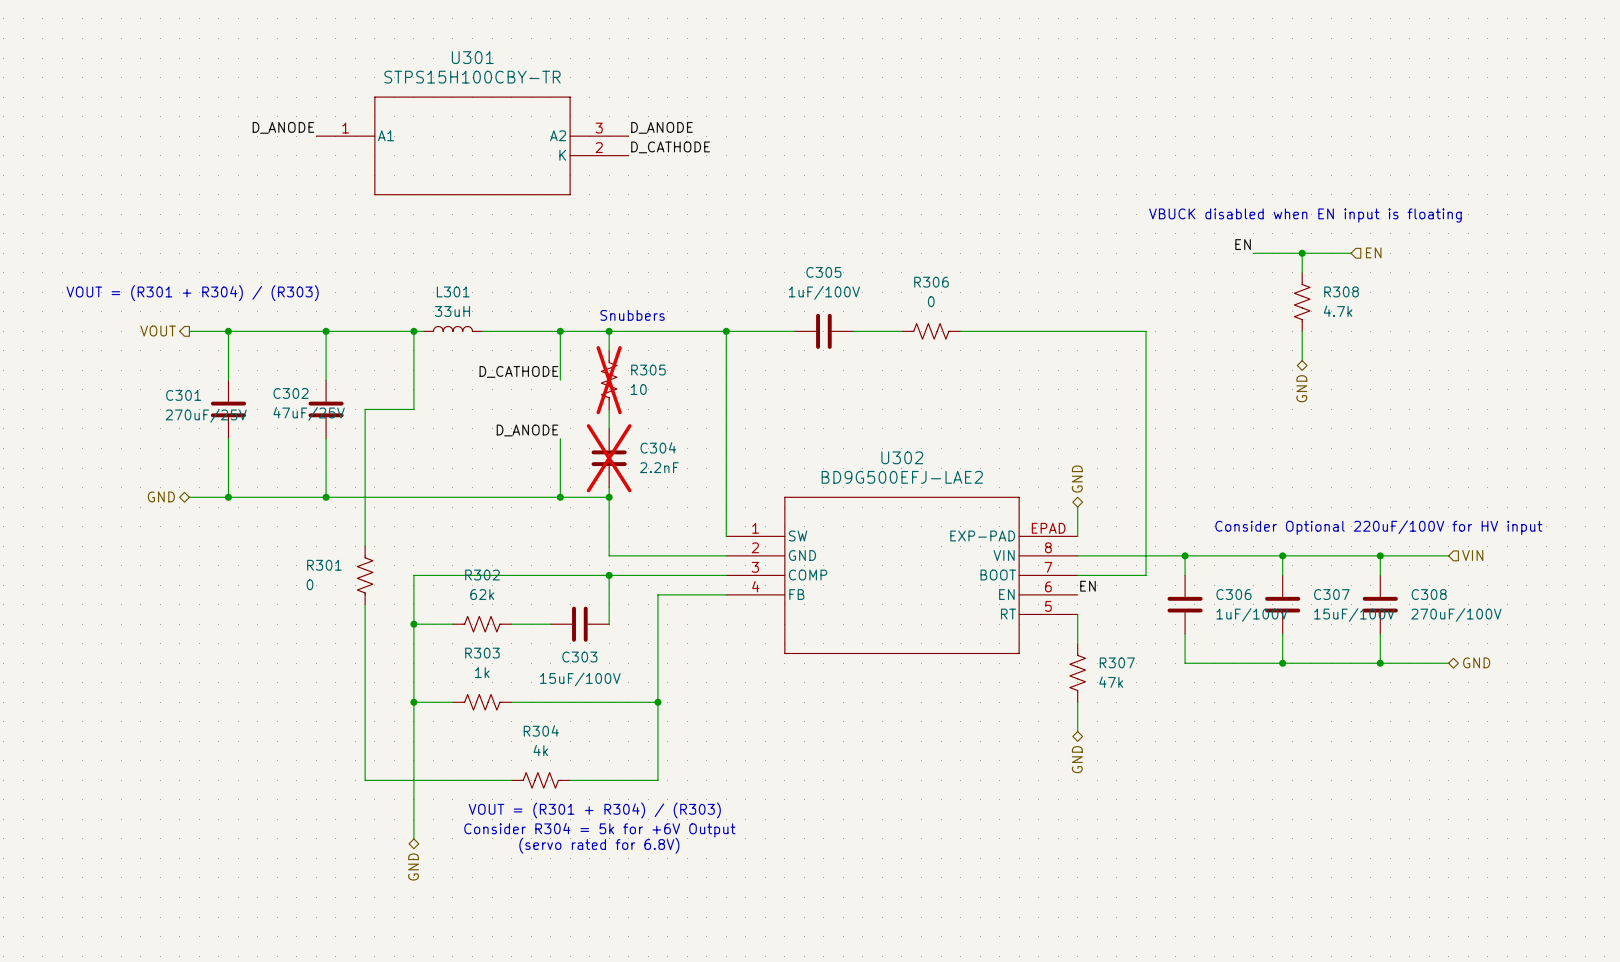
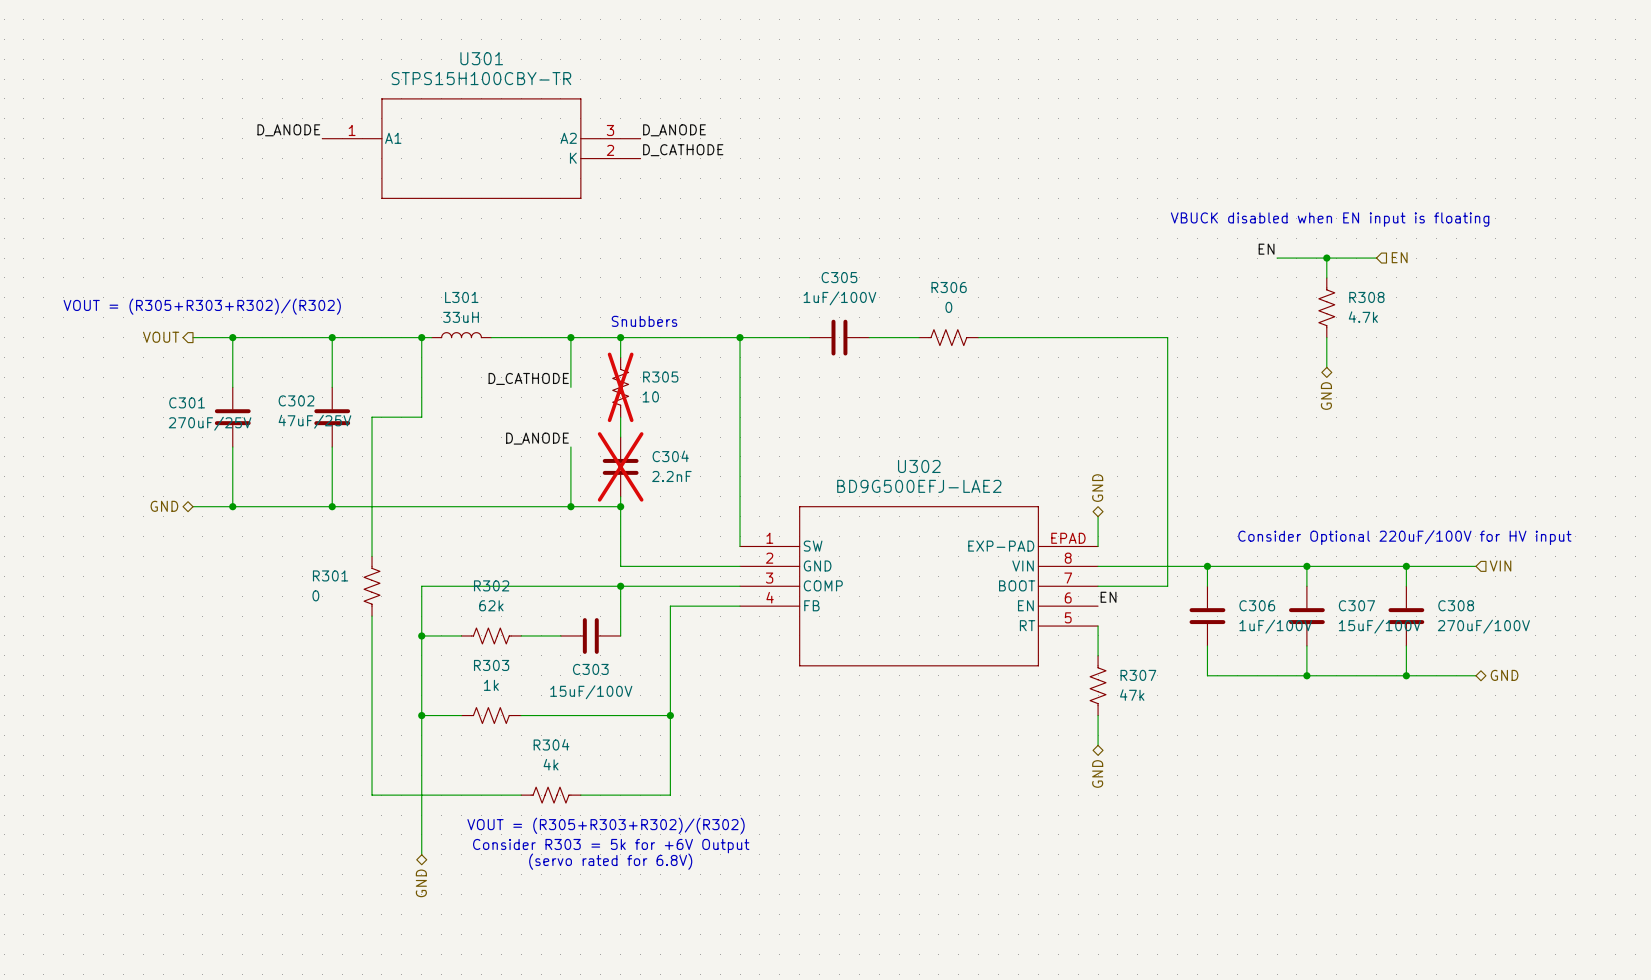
text: VOUT = (R301 + R304) / (R303) (192, 293) -> VOUT = (R305+R303+R302)/(R302) (202, 306)
text: VOUT = (R301 + R304) / (R303) (594, 810) -> VOUT = (R305+R303+R302)/(R302) (606, 825)
text: Consider R304 = 5k for +6V Output (599, 830) -> Consider R303 = 5k for +6V Output (611, 846)

